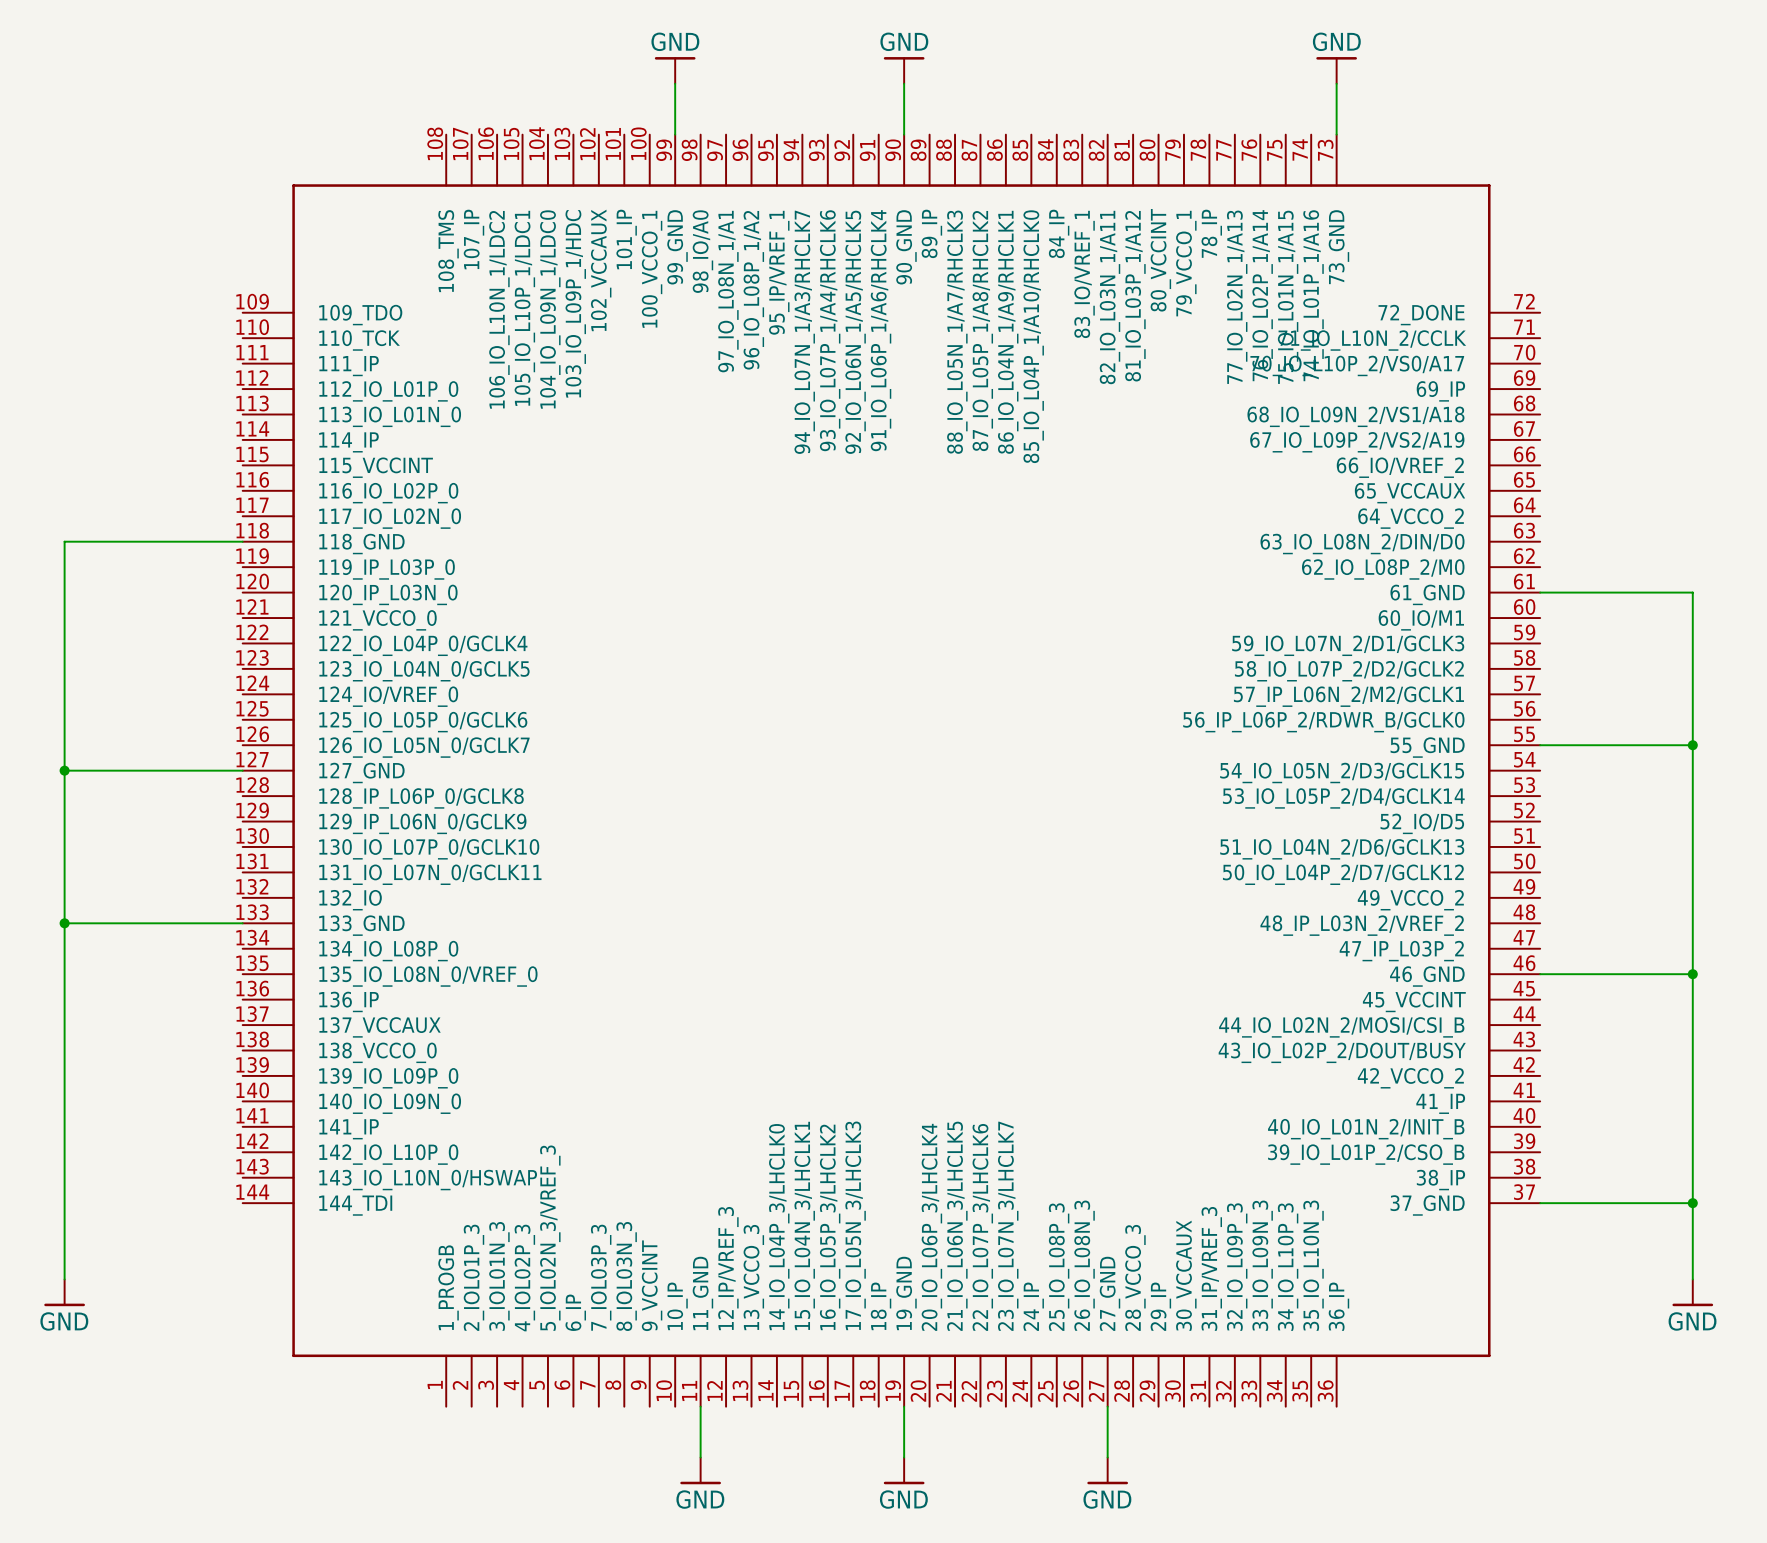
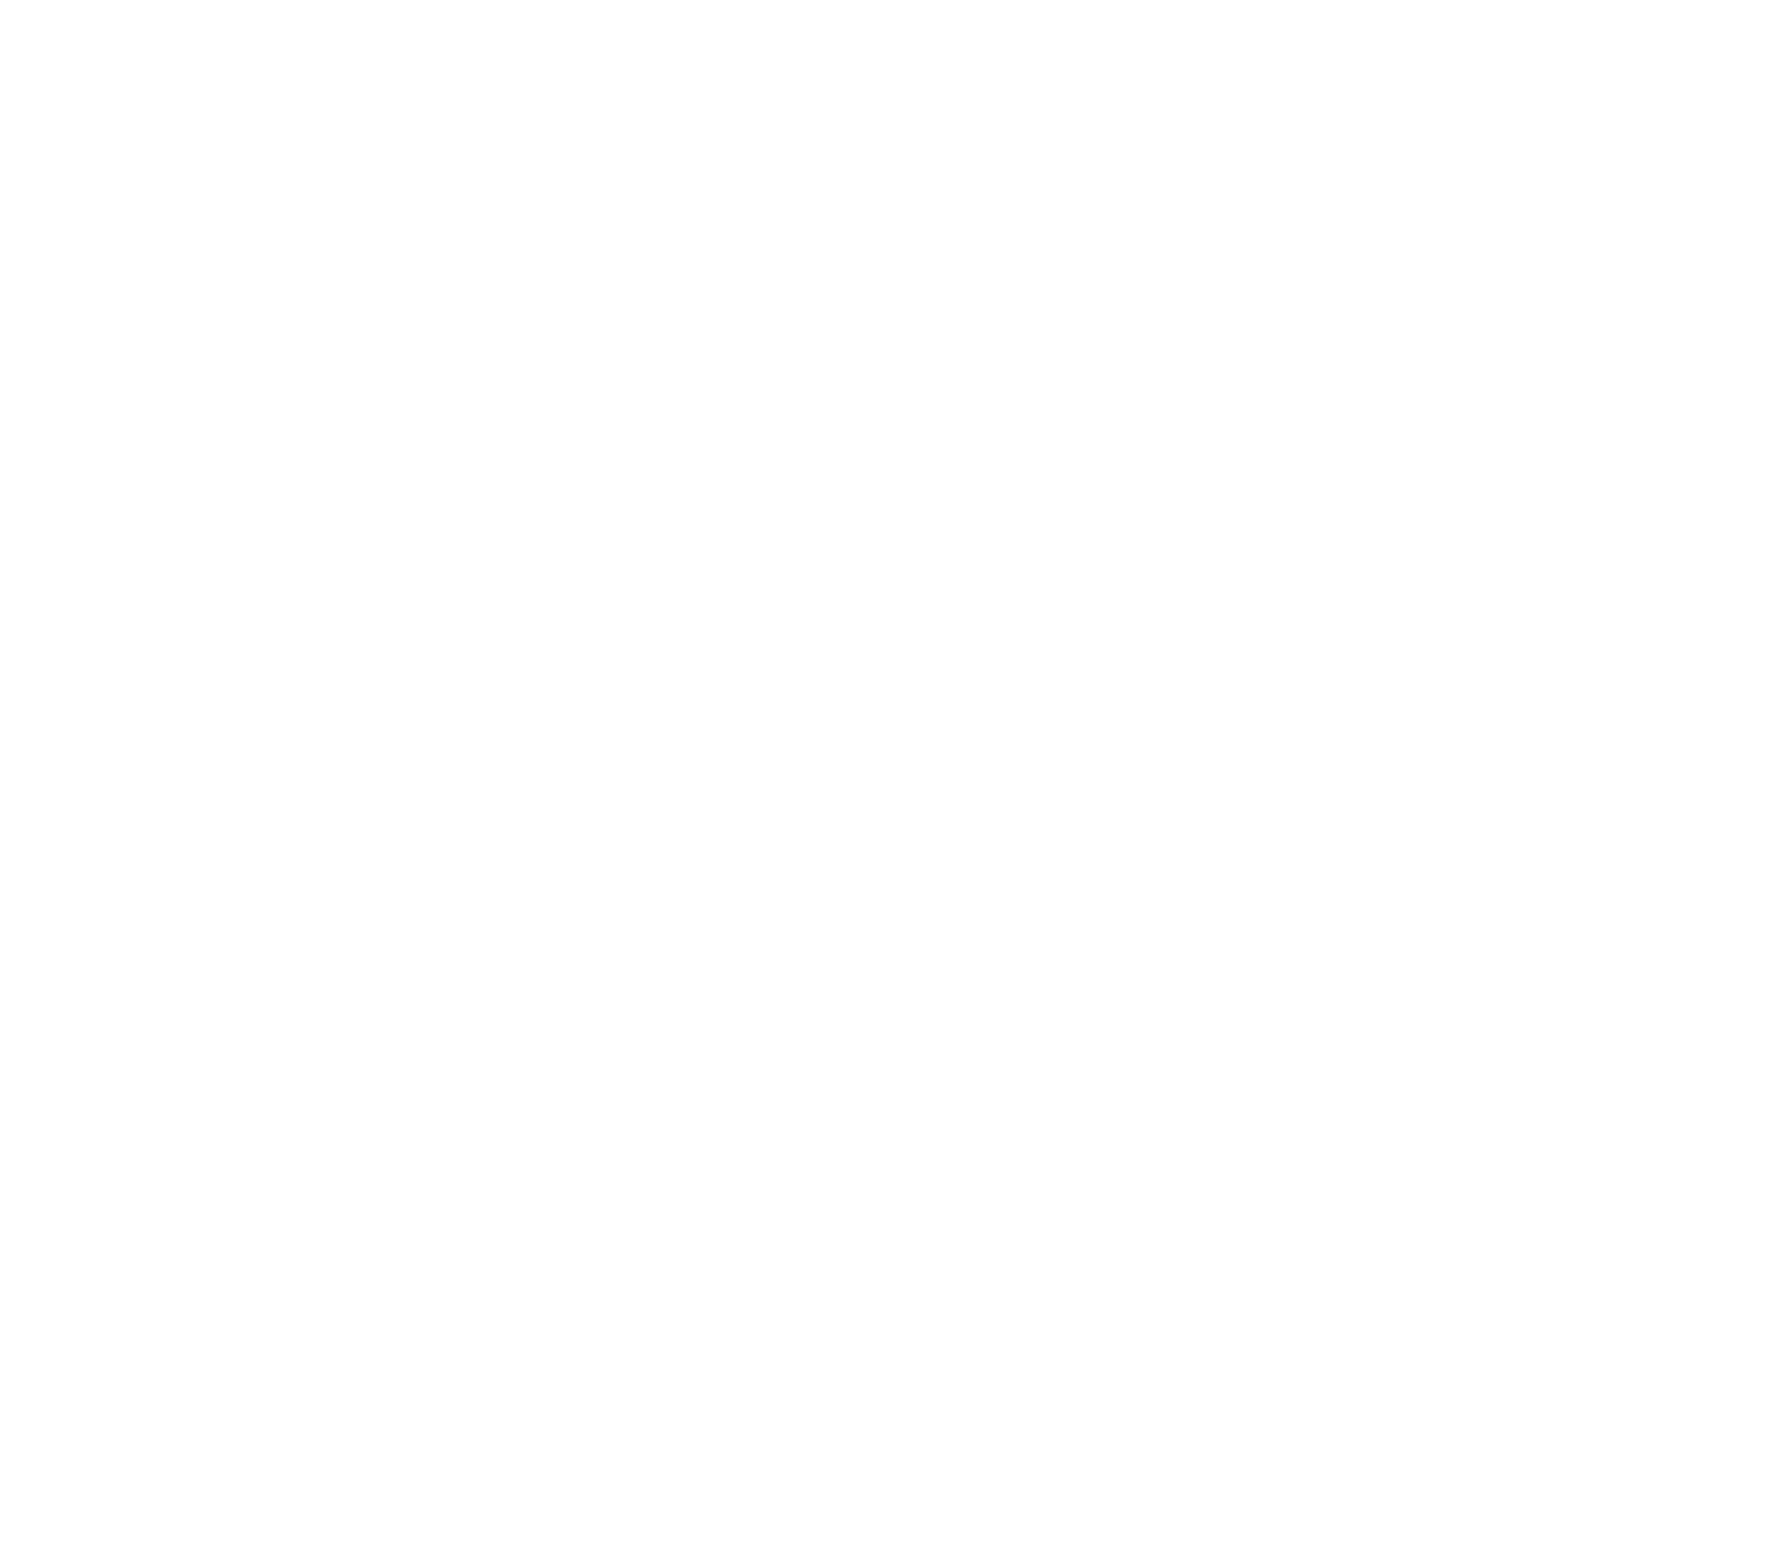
power symbol: GND (675, 70) -> none
power symbol: GND (904, 70) -> none
power symbol: GND (1336, 70) -> none
wire: (675, 83) (675, 134) -> none
wire: (904, 83) (904, 134) -> none
wire: (1336, 83) (1336, 134) -> none
wire: (242, 541) (64, 541) (64, 1279) -> none
wire: (1540, 592) (1692, 592) (1692, 1279) -> none
wire: (1540, 745) (1692, 745) -> none
junction: (1692, 745) -> none
wire: (64, 770) (242, 770) -> none
junction: (64, 770) -> none
part: (891, 770) -> none
wire: (64, 923) (242, 923) -> none
junction: (64, 923) -> none
wire: (1540, 974) (1692, 974) -> none
junction: (1692, 974) -> none
wire: (1540, 1203) (1692, 1203) -> none
junction: (1692, 1203) -> none
power symbol: GND (64, 1292) -> none
power symbol: GND (1692, 1292) -> none
wire: (700, 1406) (700, 1457) -> none
wire: (904, 1406) (904, 1457) -> none
wire: (1107, 1406) (1107, 1457) -> none
power symbol: GND (700, 1470) -> none
power symbol: GND (904, 1470) -> none
power symbol: GND (1107, 1470) -> none

